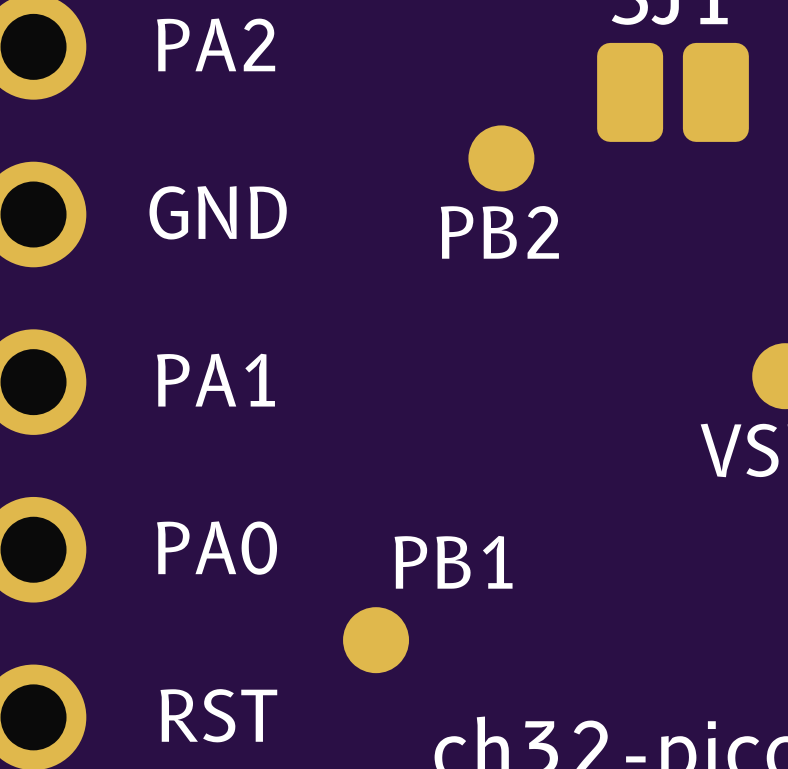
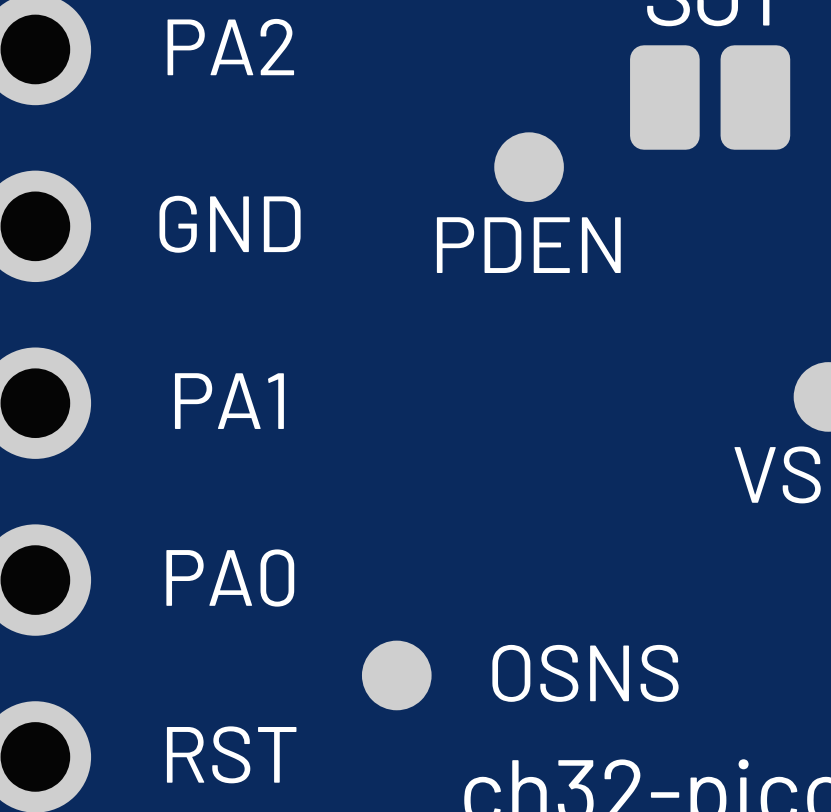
text: PB2 (499, 232) -> PDEN (528, 245)
text: PB1 (453, 562) -> none
text: none -> OSNS (585, 673)

